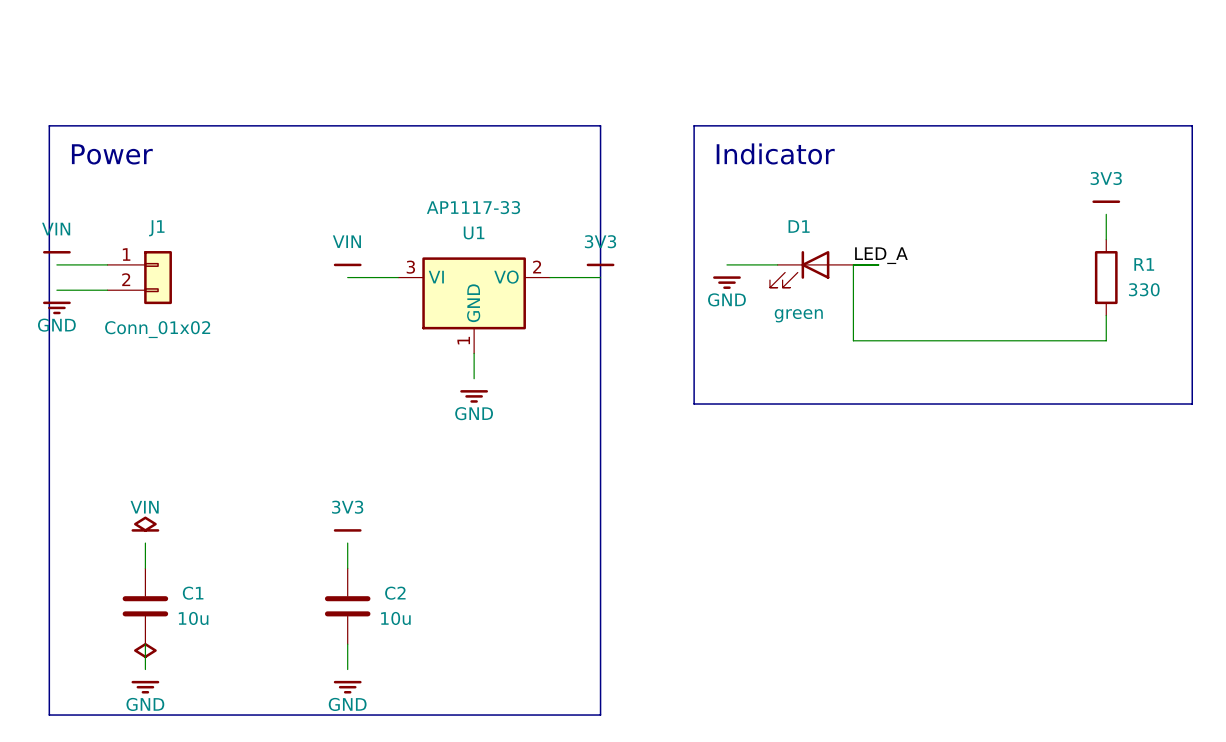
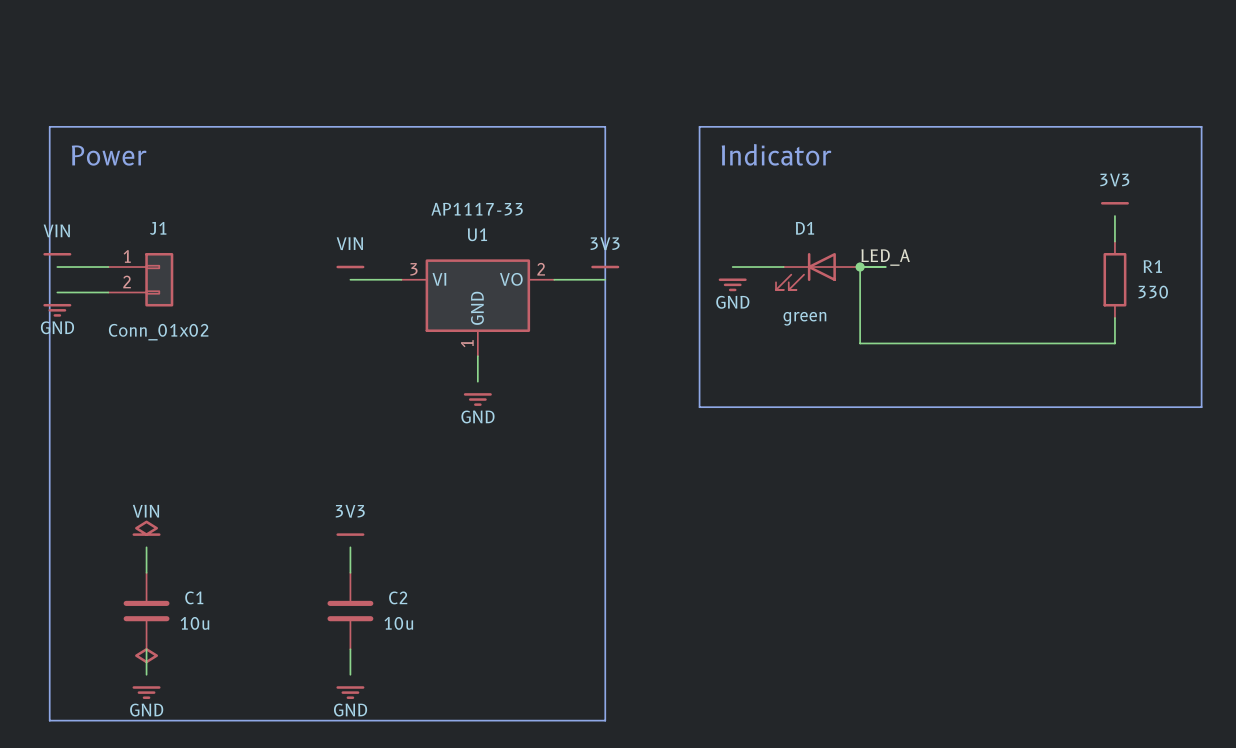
junction: none -> (860, 267)

